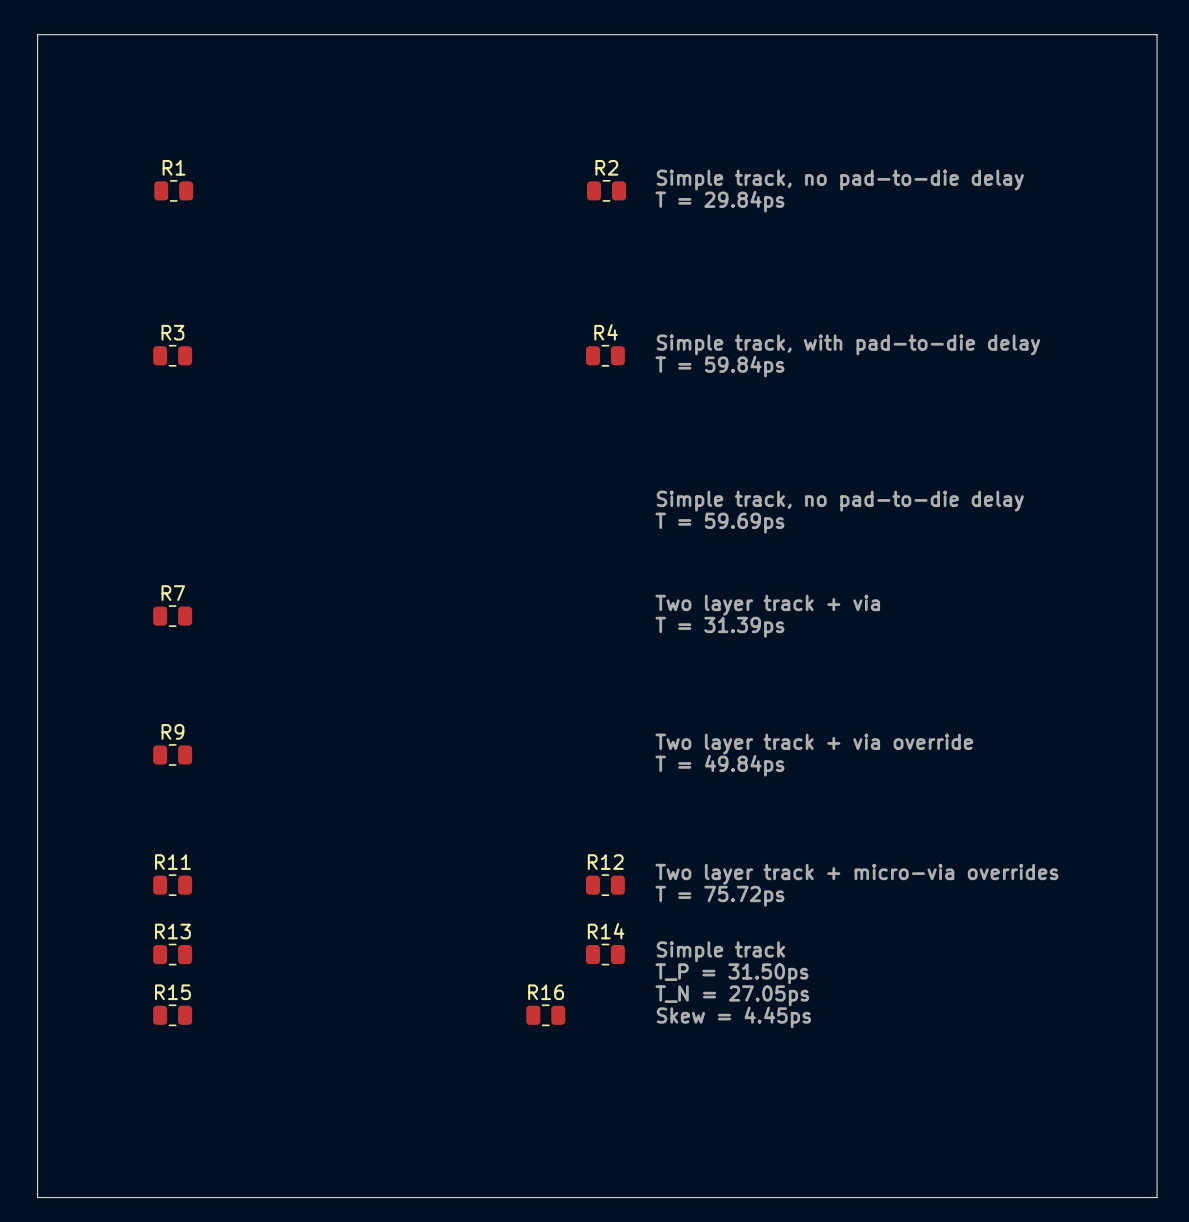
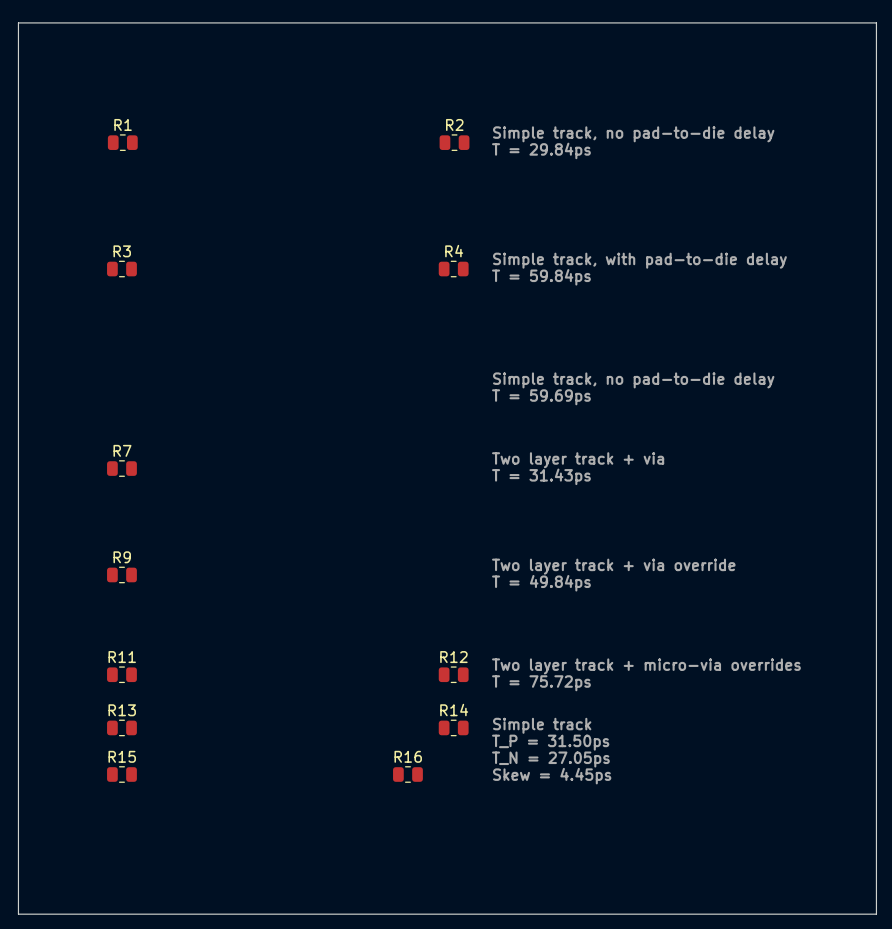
text: T = 31.39ps (719, 627) -> T = 31.43ps (541, 476)

